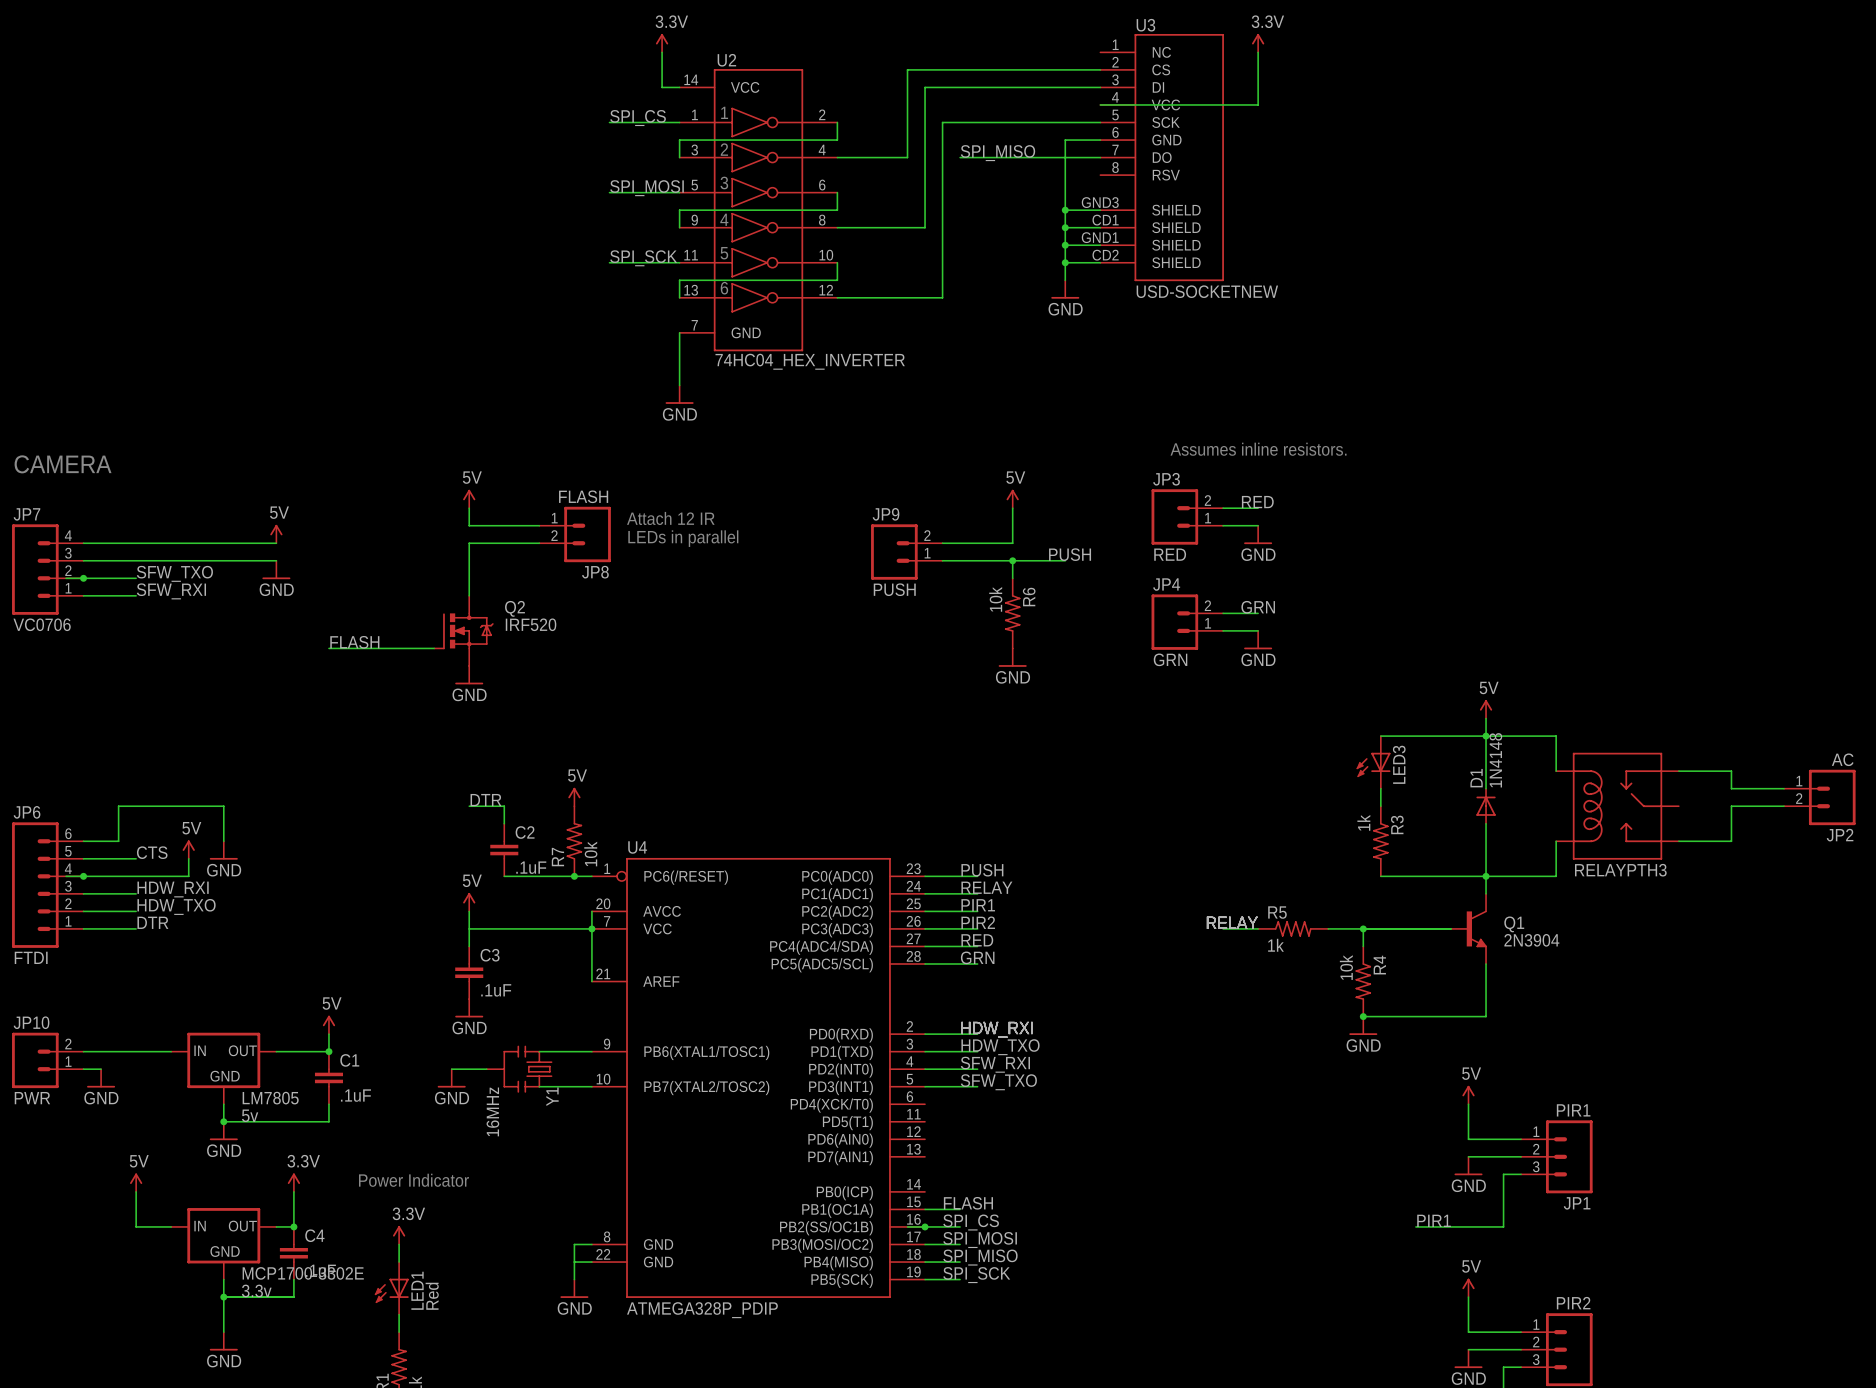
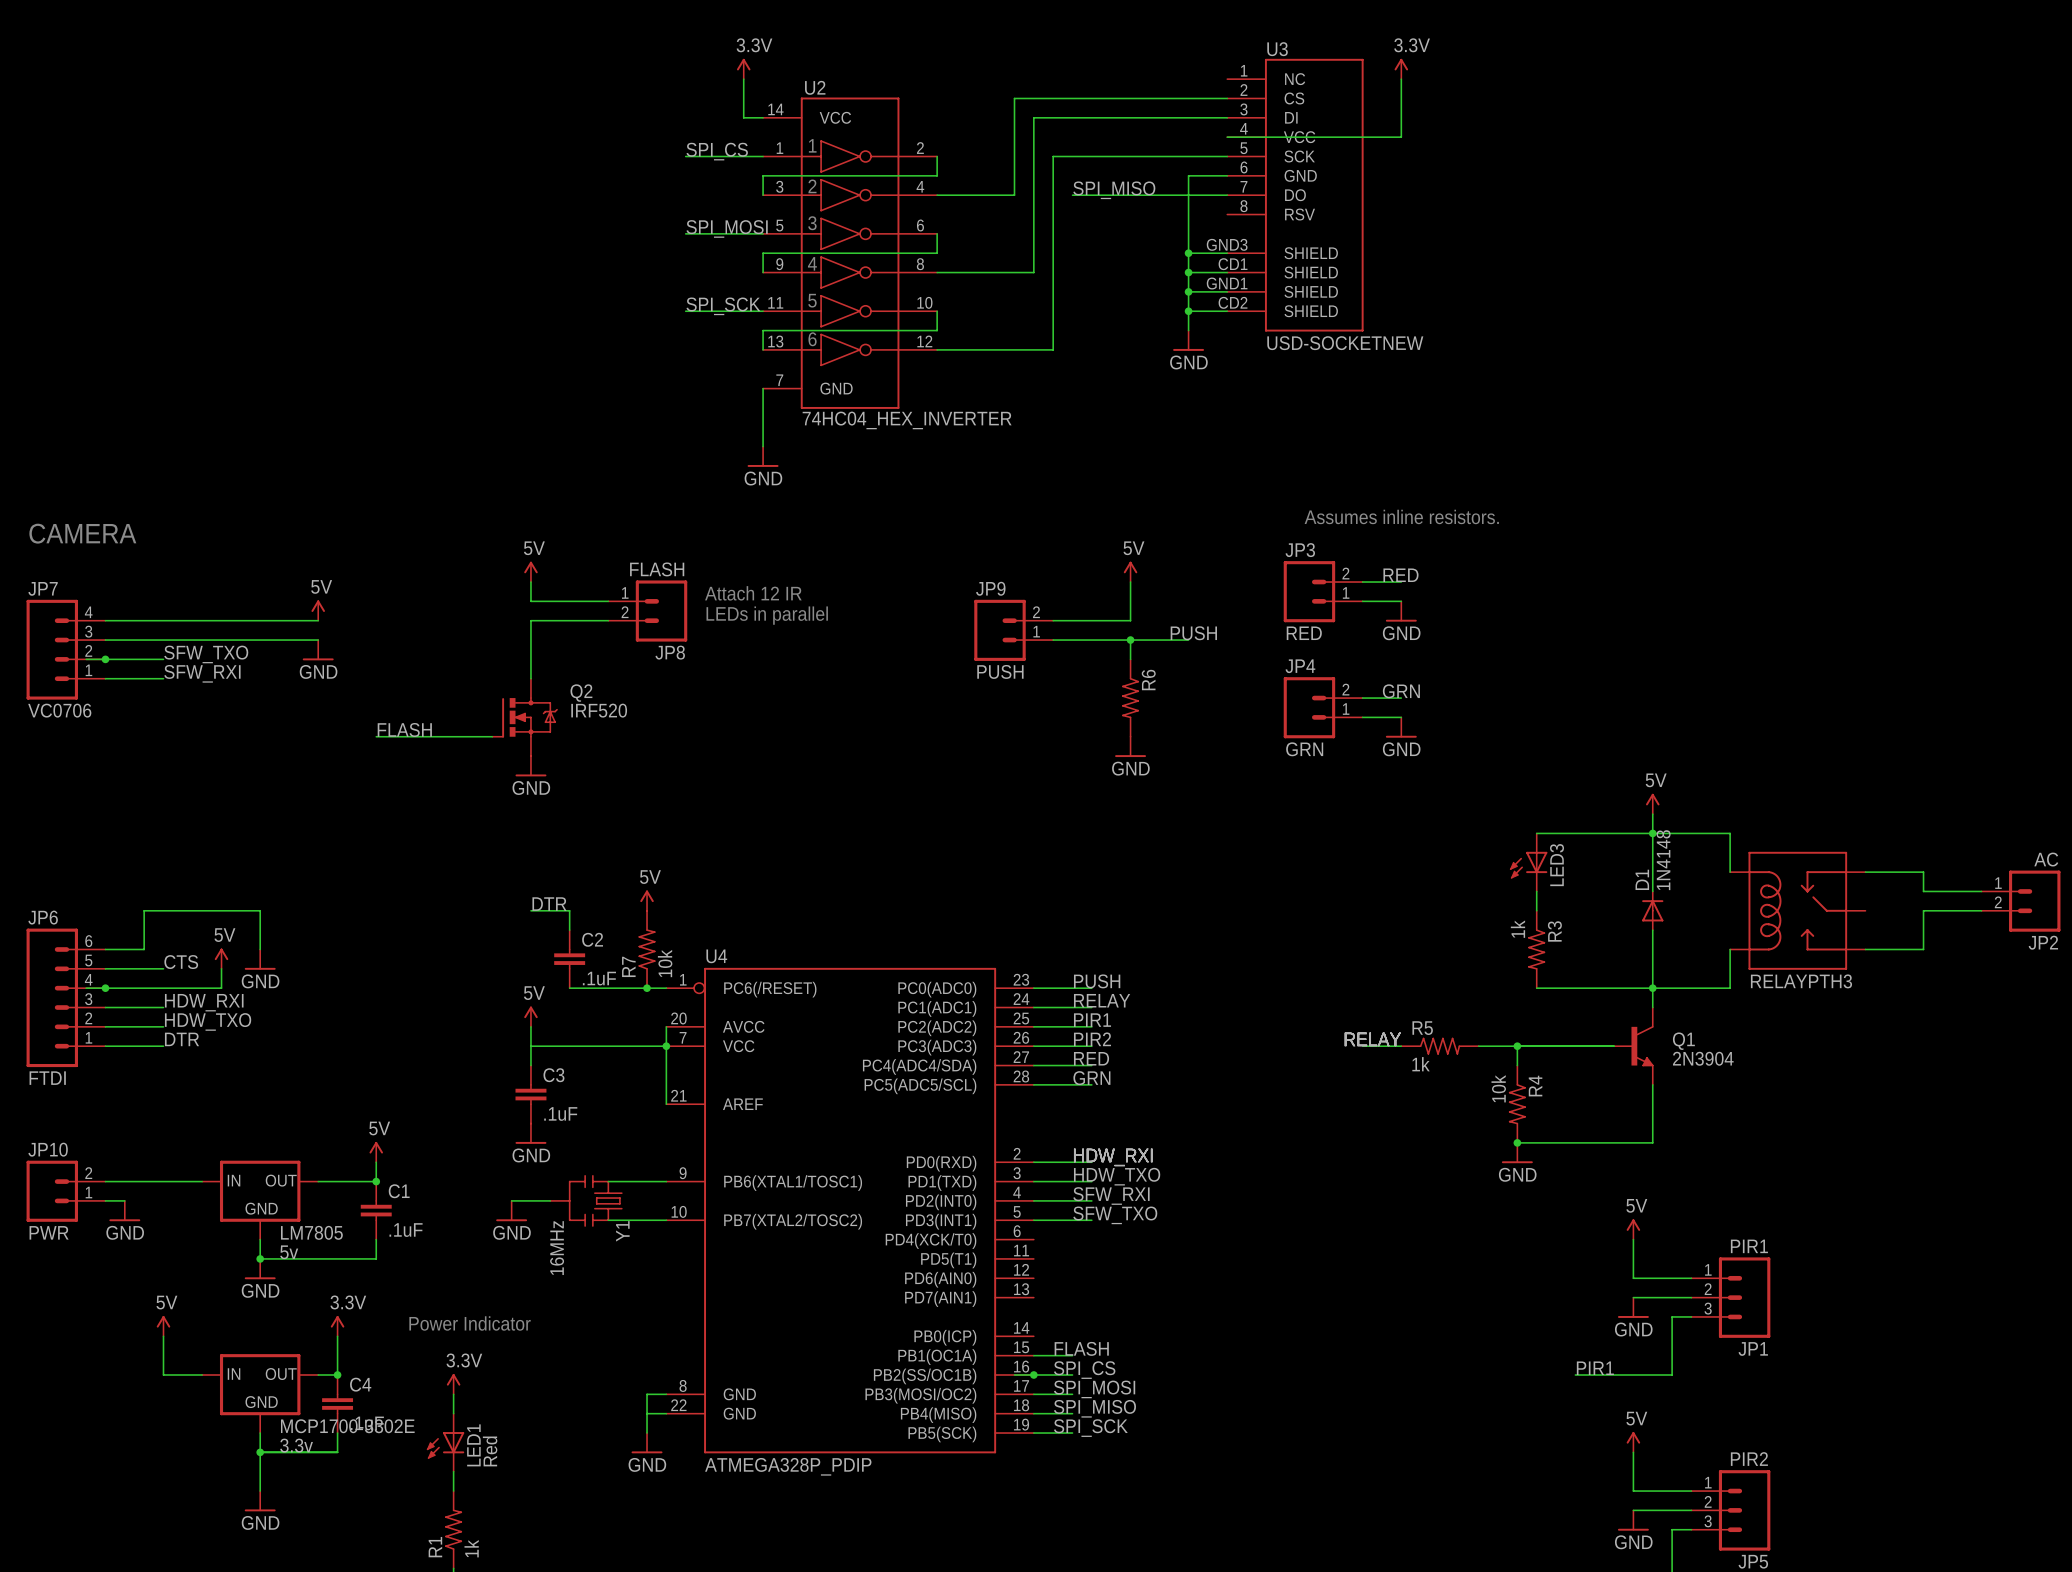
R6 value: 10k (995, 599) -> none

